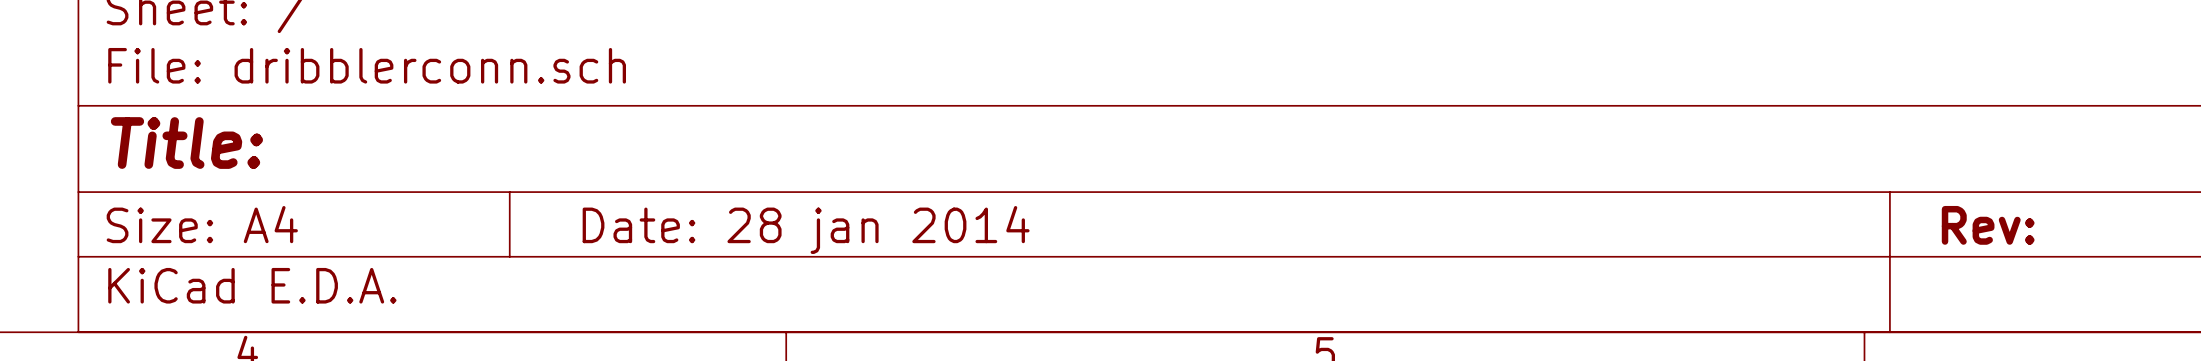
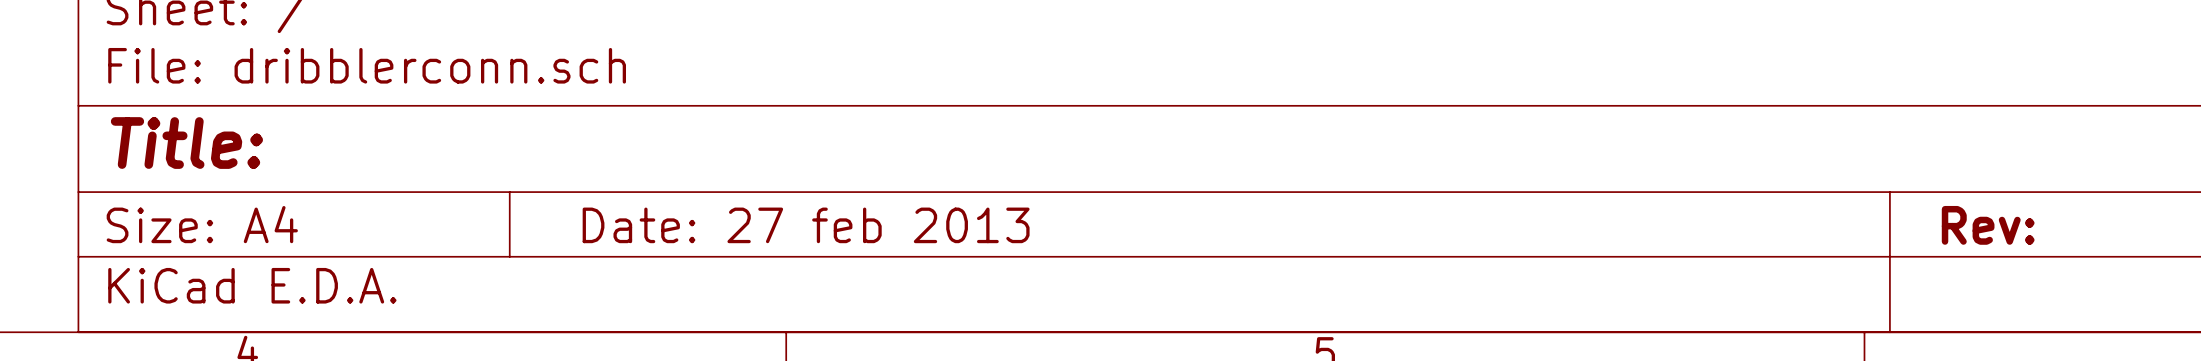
title block: Date: 28 jan 2014 (806, 229) -> Date: 27 feb 2013 (806, 225)

